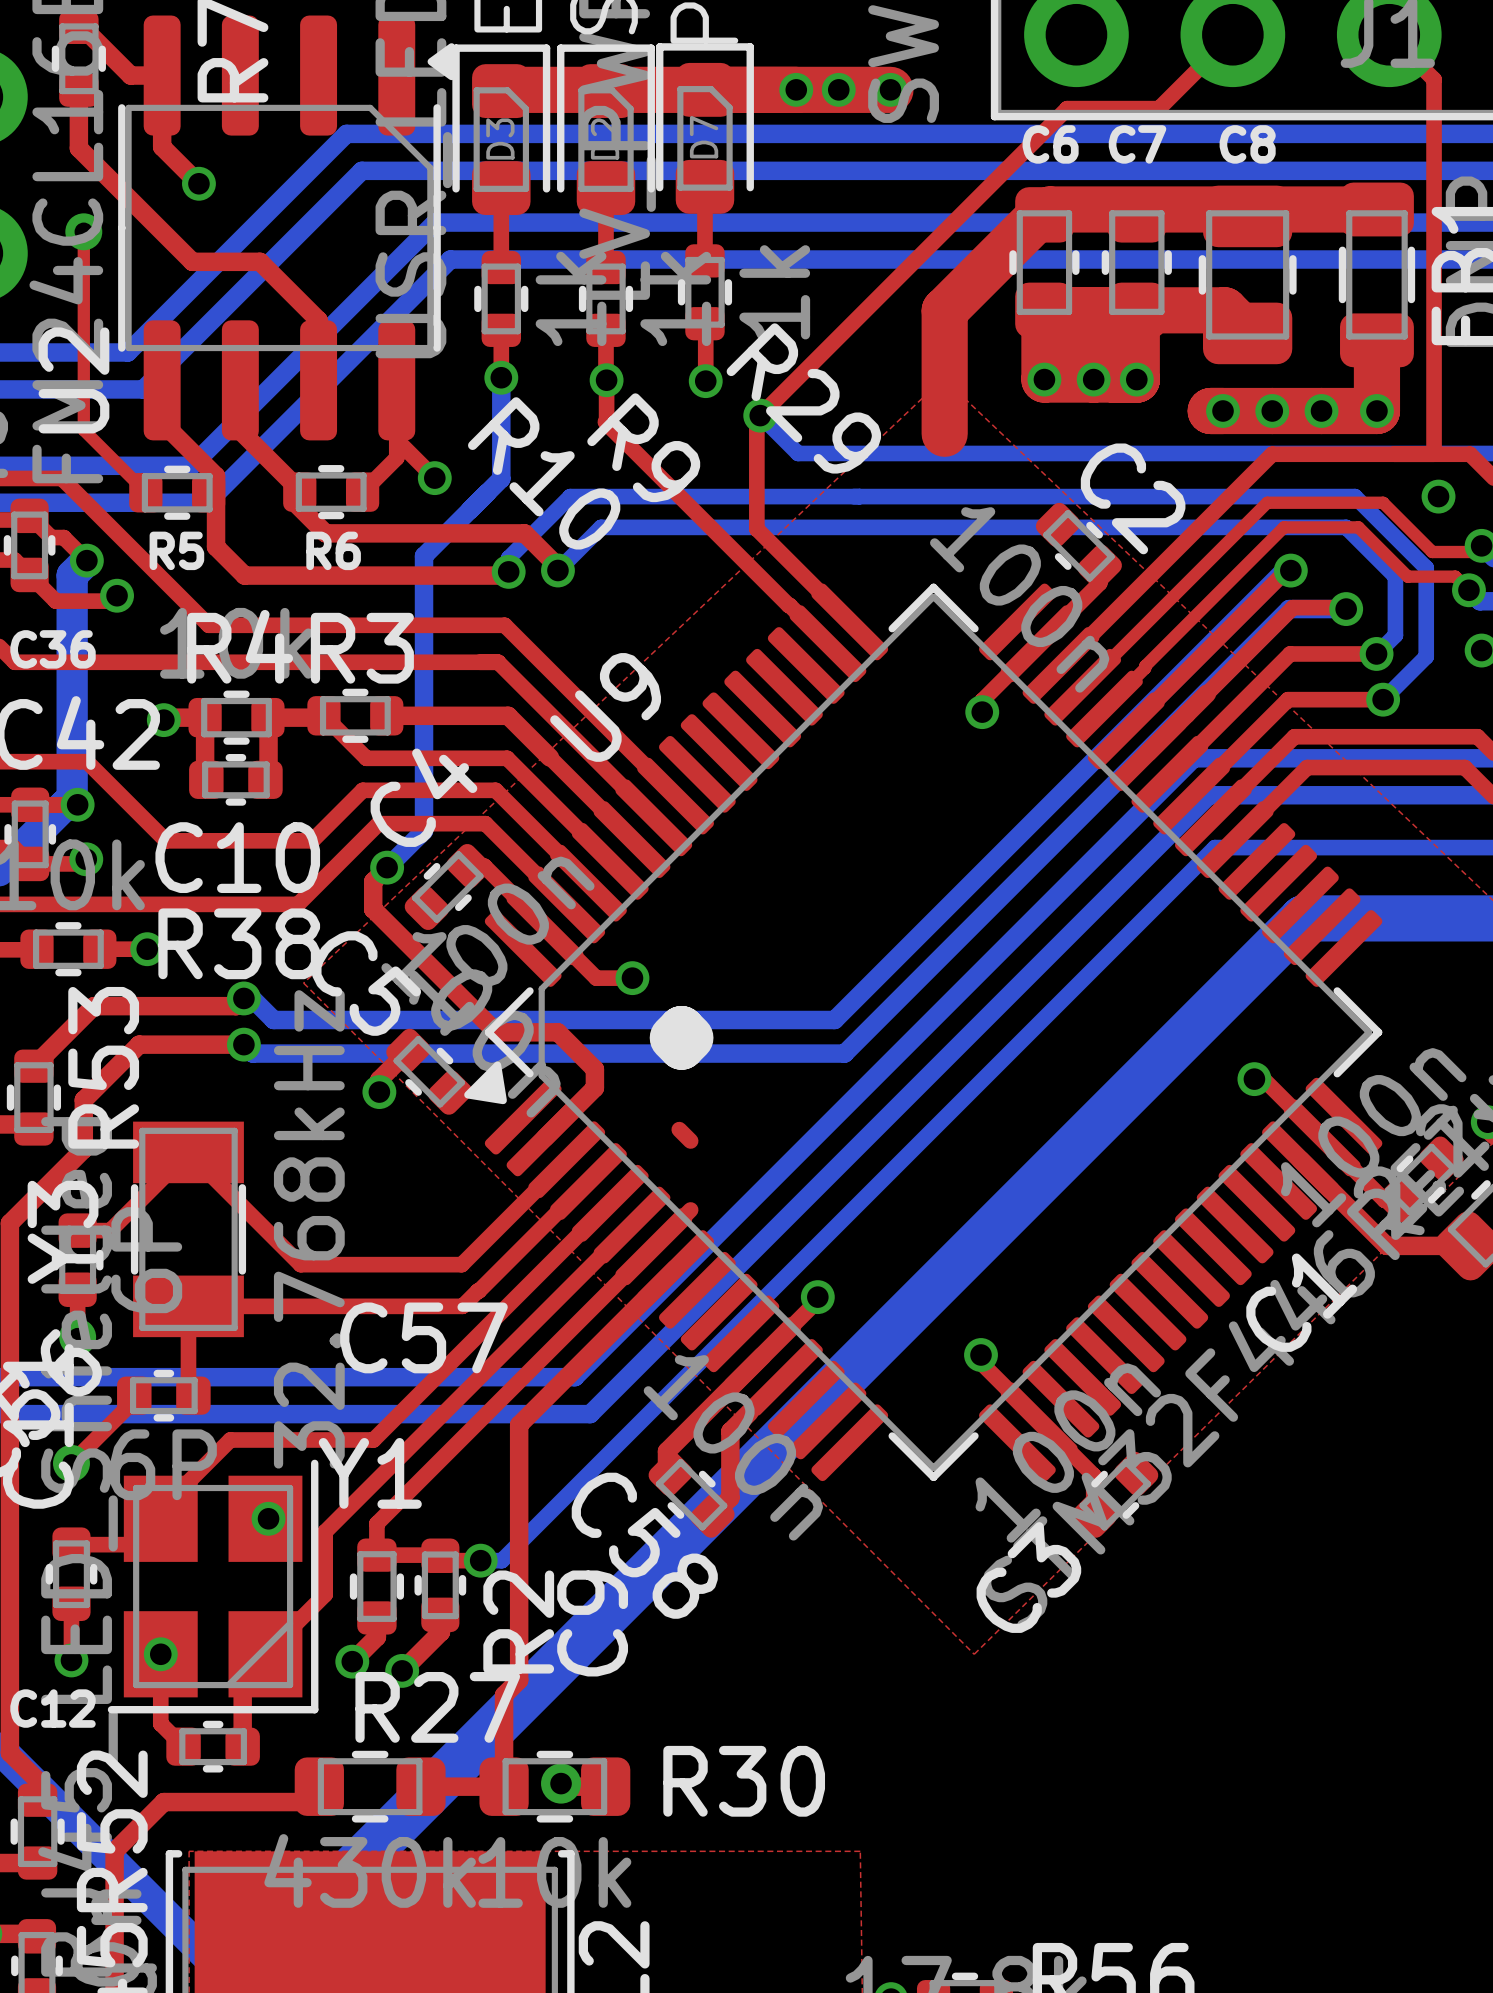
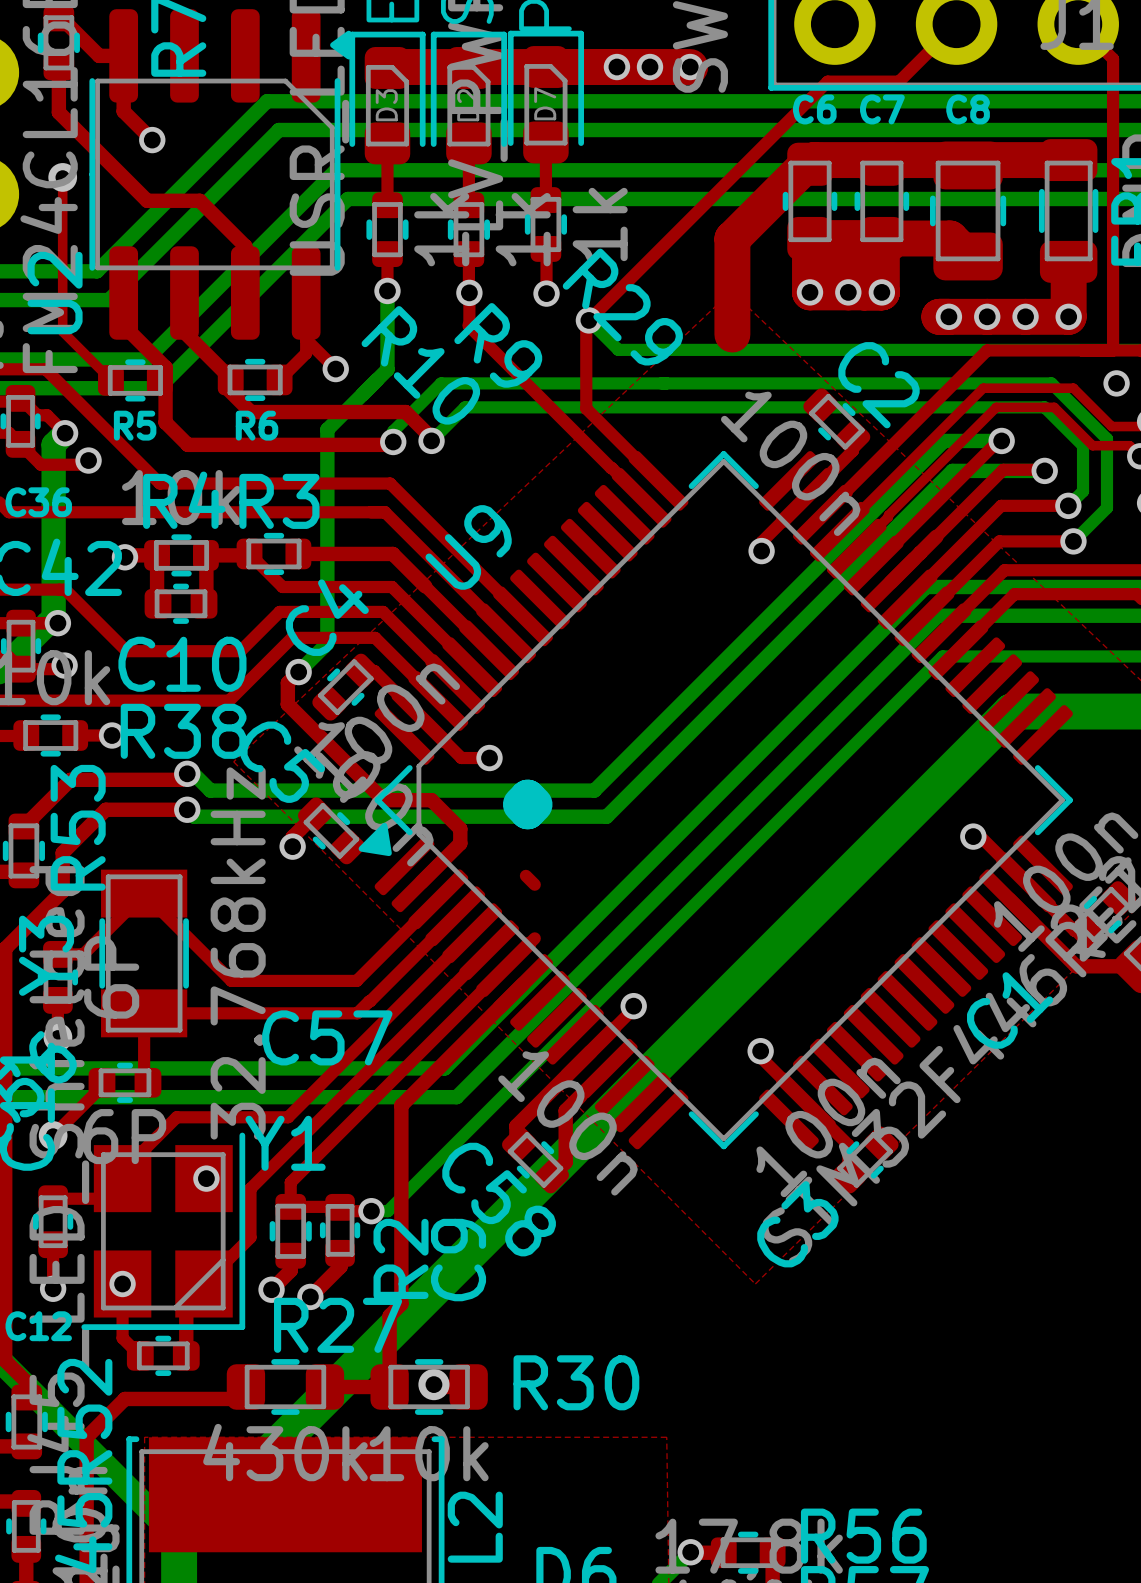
bottom track: (1284, 570) (834, 1020) (767, 1020) -> (996, 440) (944, 440) (594, 790)
bottom track: (1289, 609) (844, 1053) (783, 1053) -> (1000, 470) (952, 470) (606, 816)

